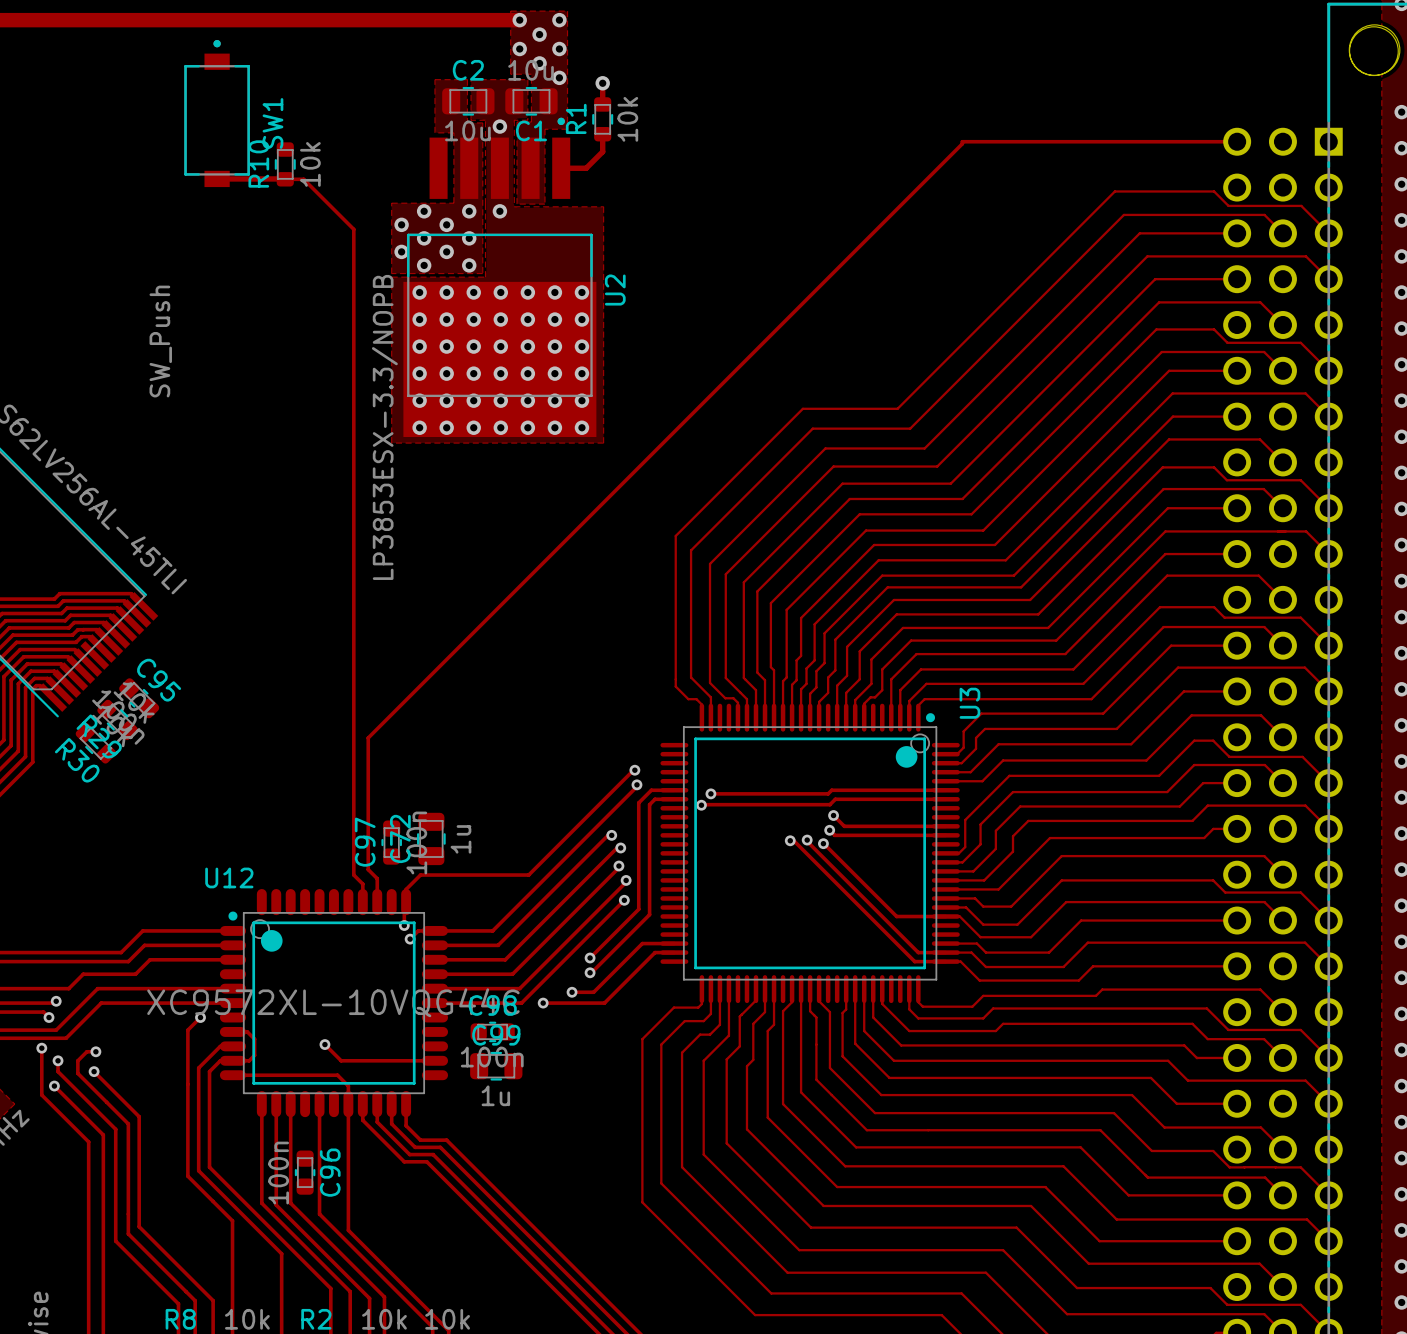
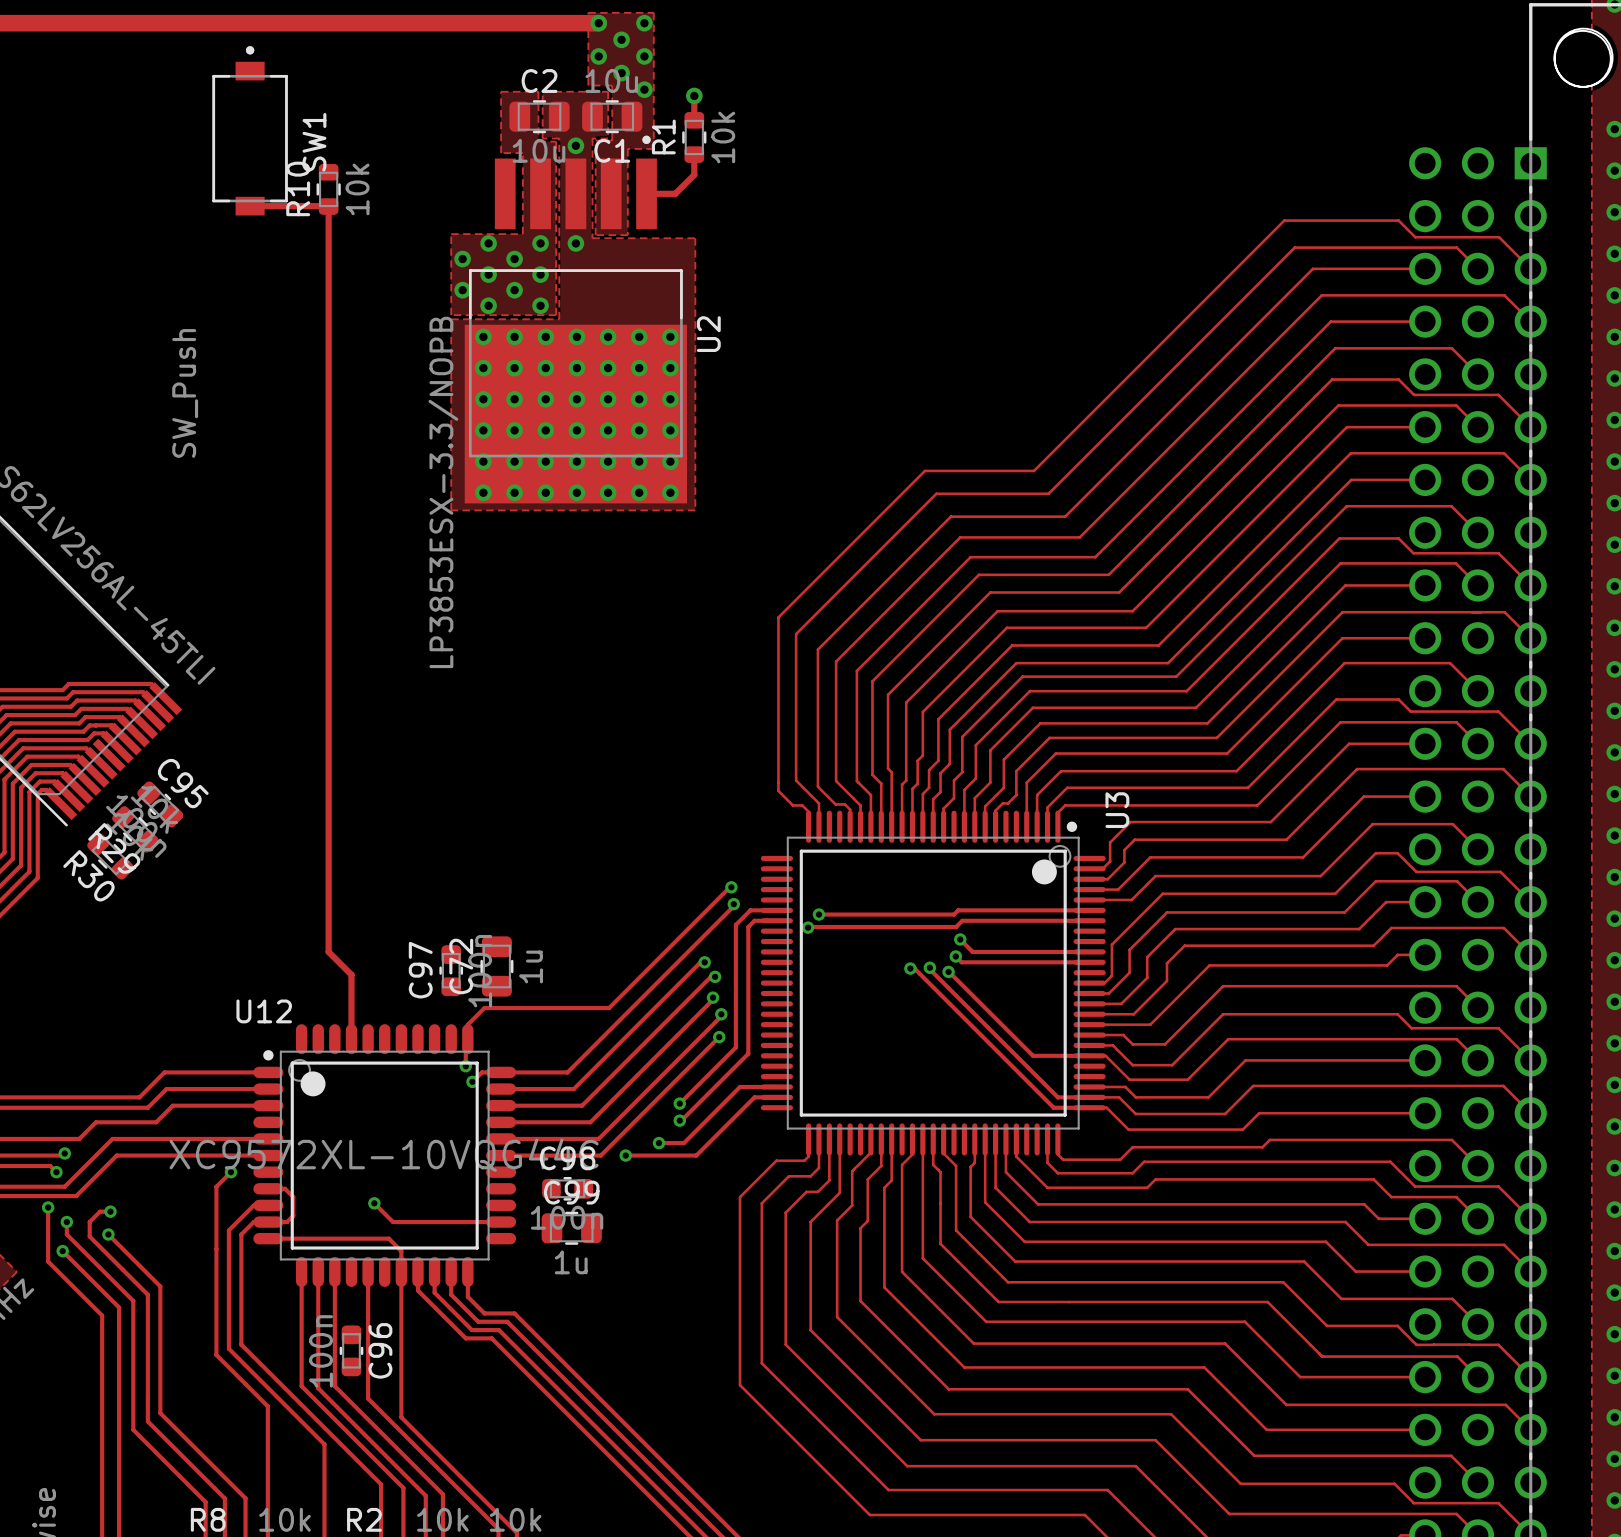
track: (1237, 141) (962, 141) (368, 737) (368, 869) (377, 878) (377, 902) -> none
track: (285, 179) (303, 179) (353, 229) (353, 875) (362, 884) (362, 902) -> (328, 206) (328, 951) (351, 974) (351, 1039)

